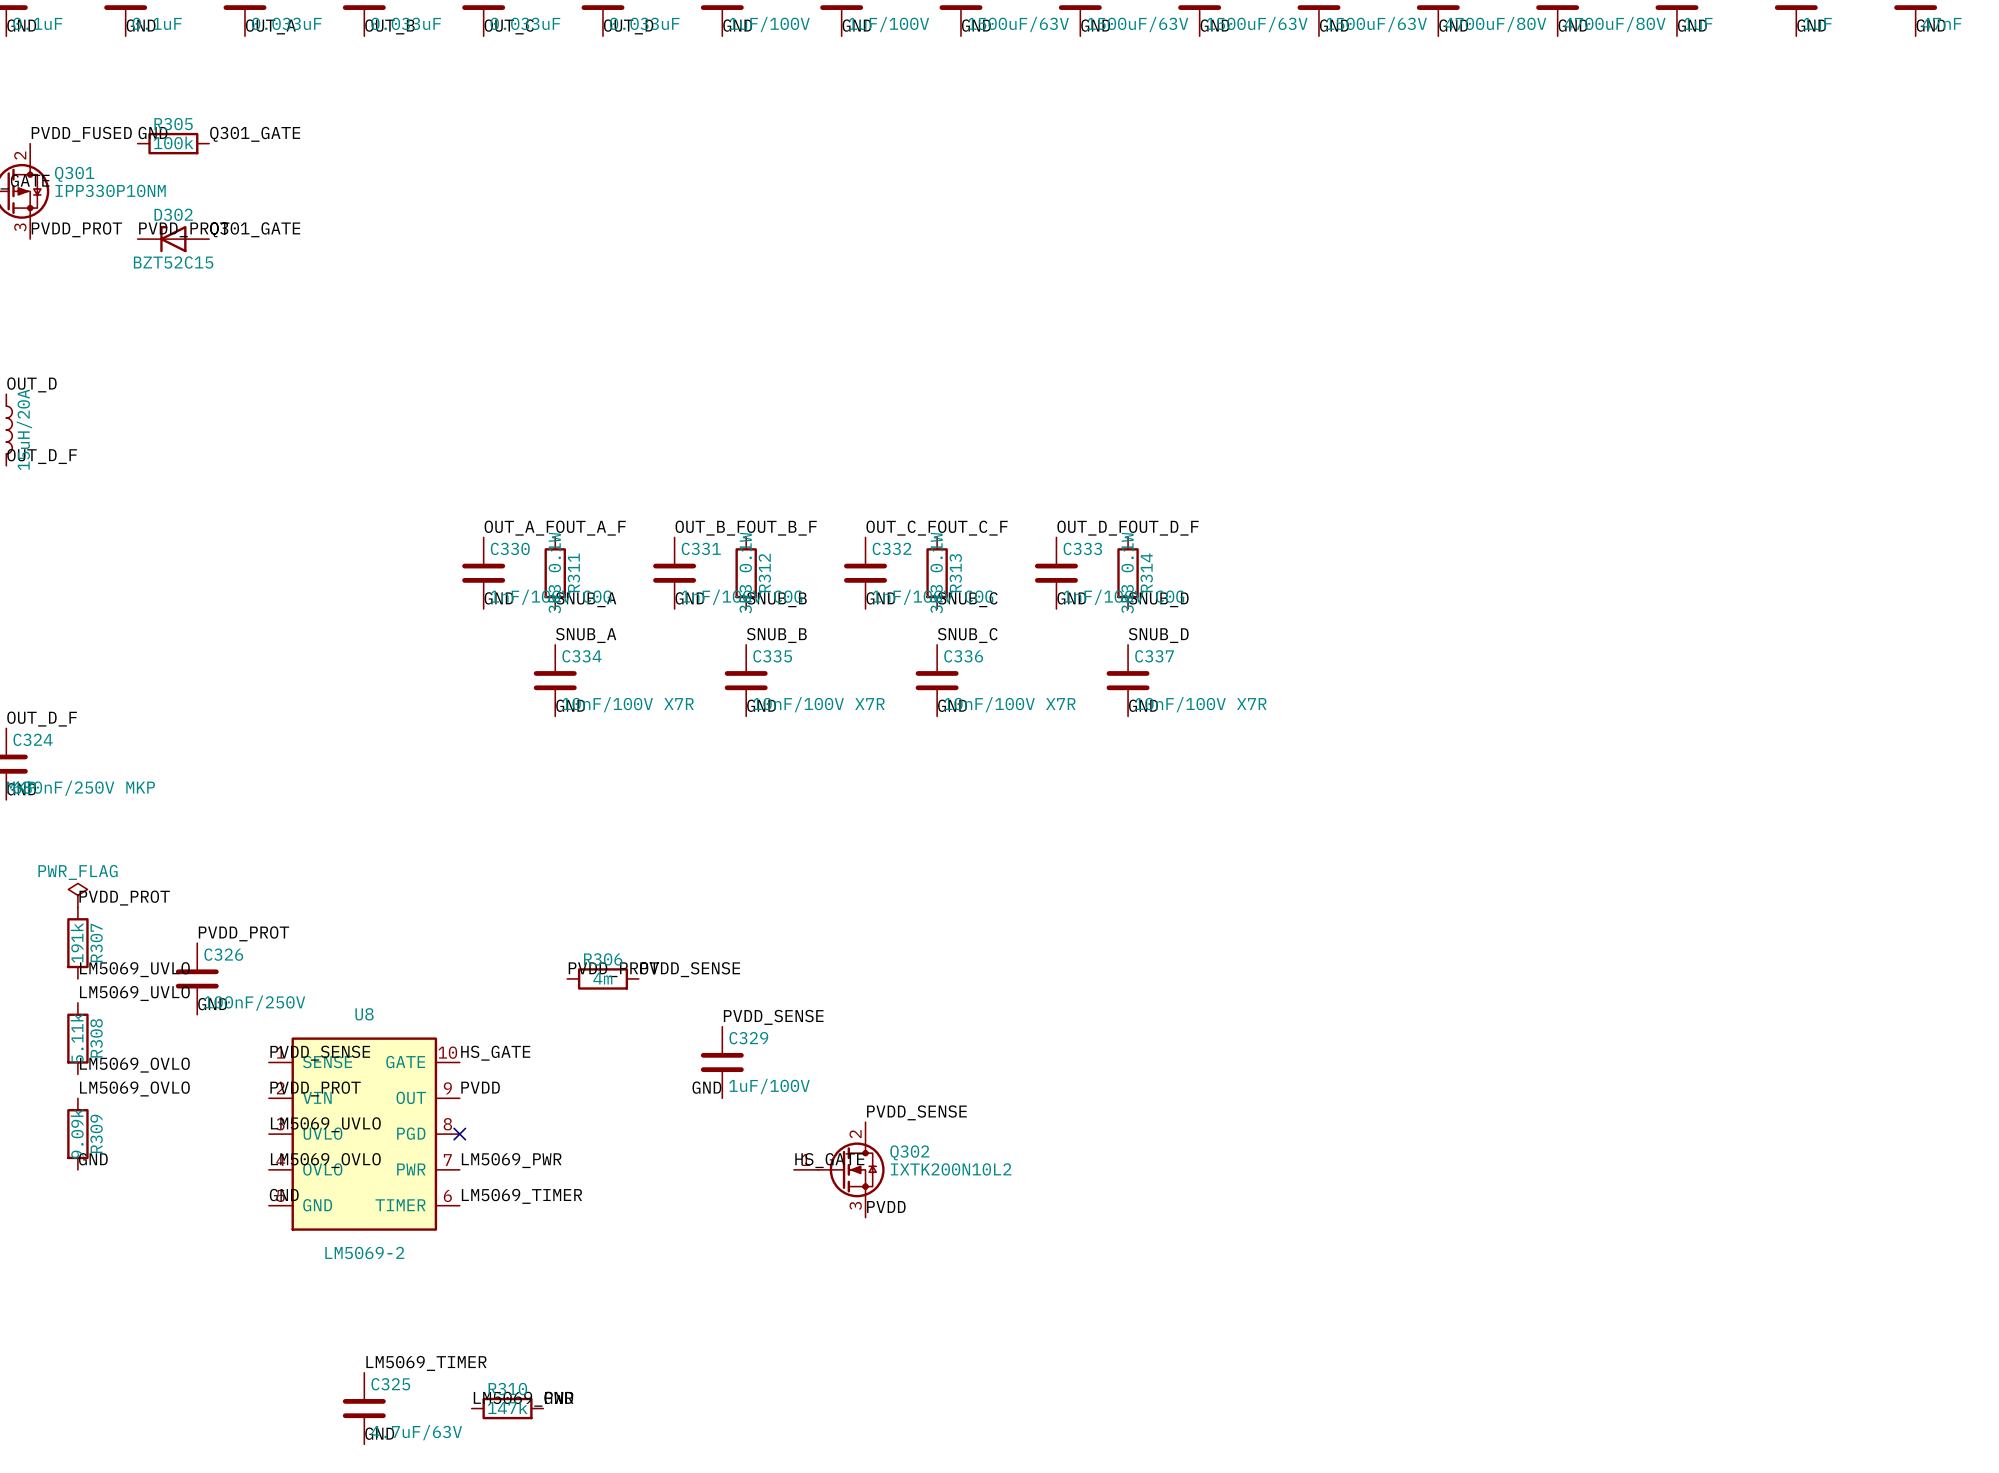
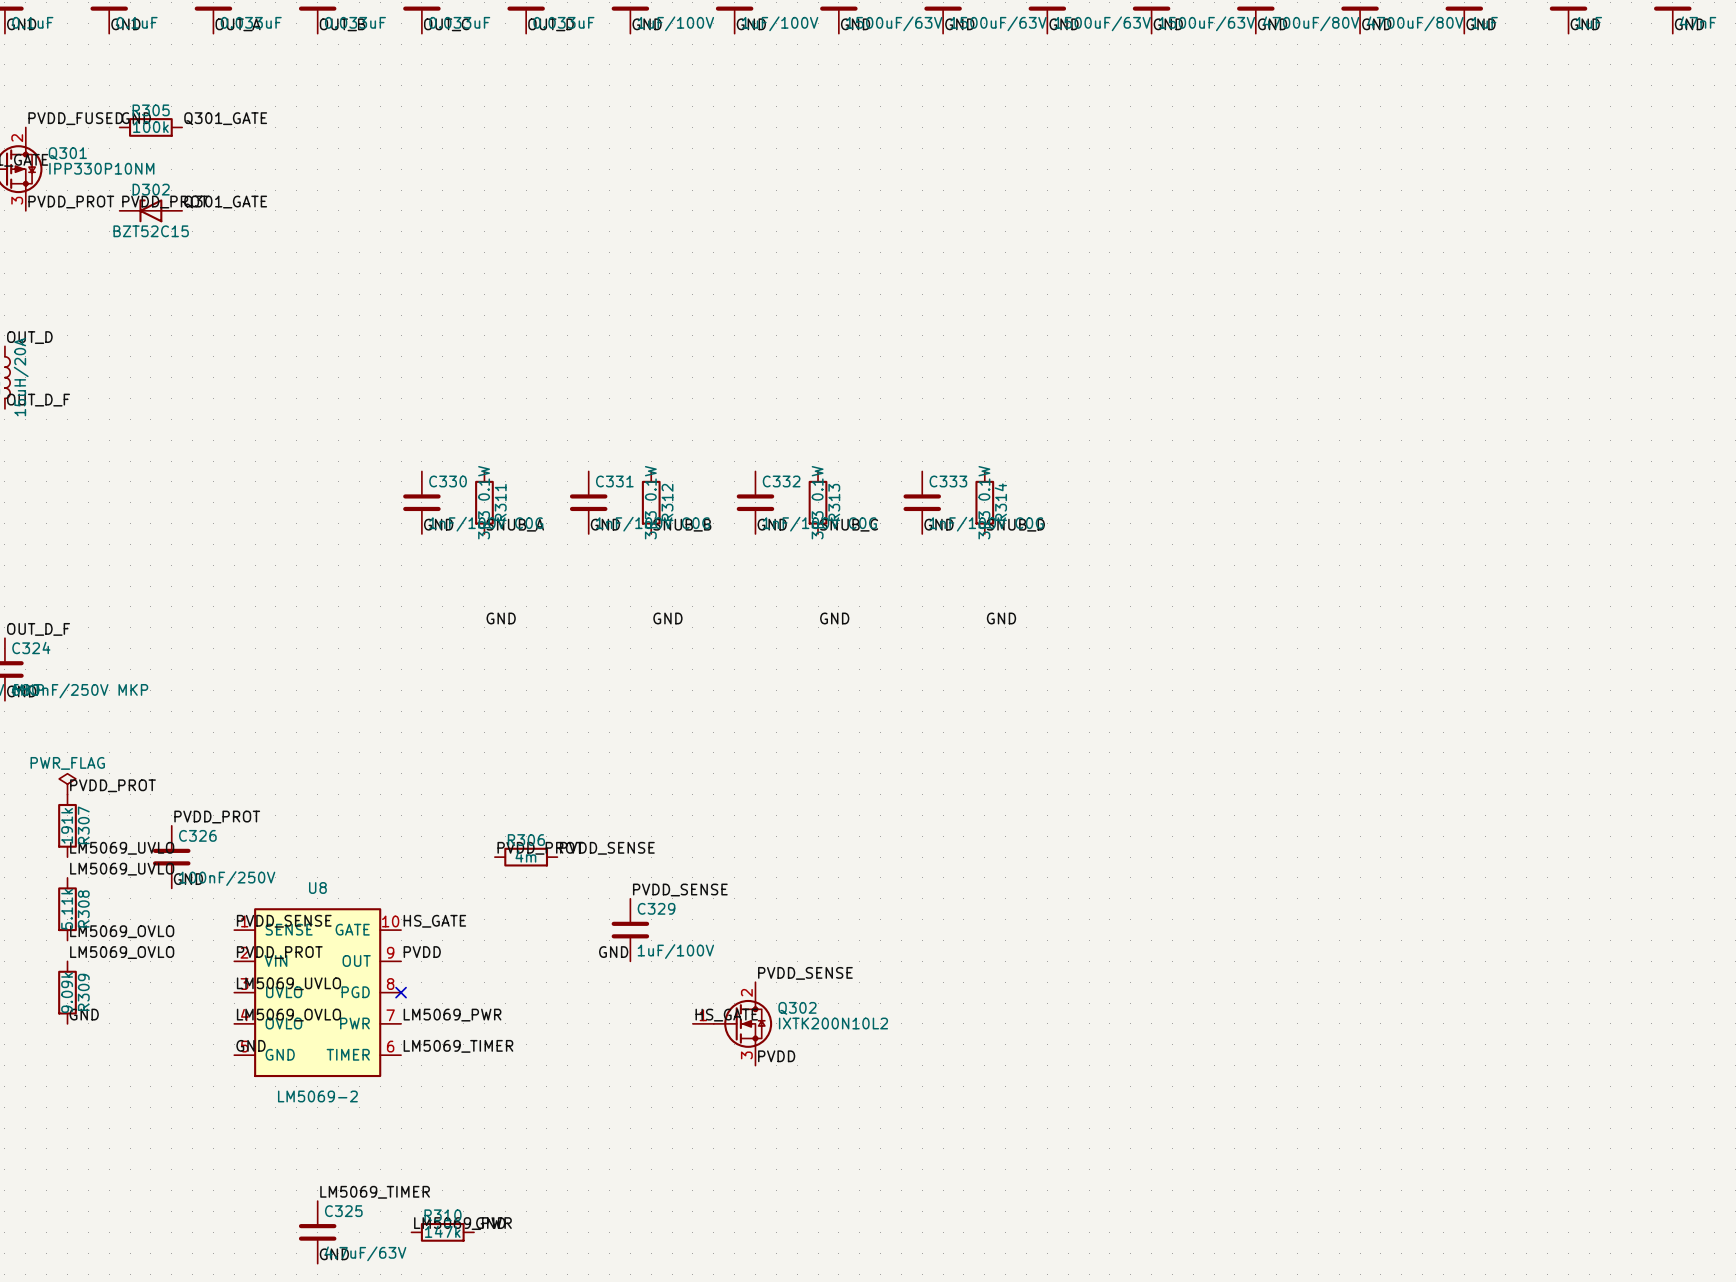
label: OUT_A_F (519, 528) -> none
label: OUT_A_F (591, 528) -> none
label: OUT_B_F (710, 528) -> none
label: OUT_B_F (781, 528) -> none
label: OUT_C_F (901, 528) -> none
label: OUT_C_F (972, 528) -> none
label: OUT_D_F (1092, 528) -> none
label: OUT_D_F (1163, 528) -> none
label: SNUB_A (586, 635) -> none
label: SNUB_B (776, 635) -> none
label: SNUB_C (967, 635) -> none
label: SNUB_D (1158, 635) -> none
C334: 10nF/100V X7R (555, 680) -> none
C335: 10nF/100V X7R (746, 680) -> none
C336: 10nF/100V X7R (937, 680) -> none
C337: 10nF/100V X7R (1128, 680) -> none

